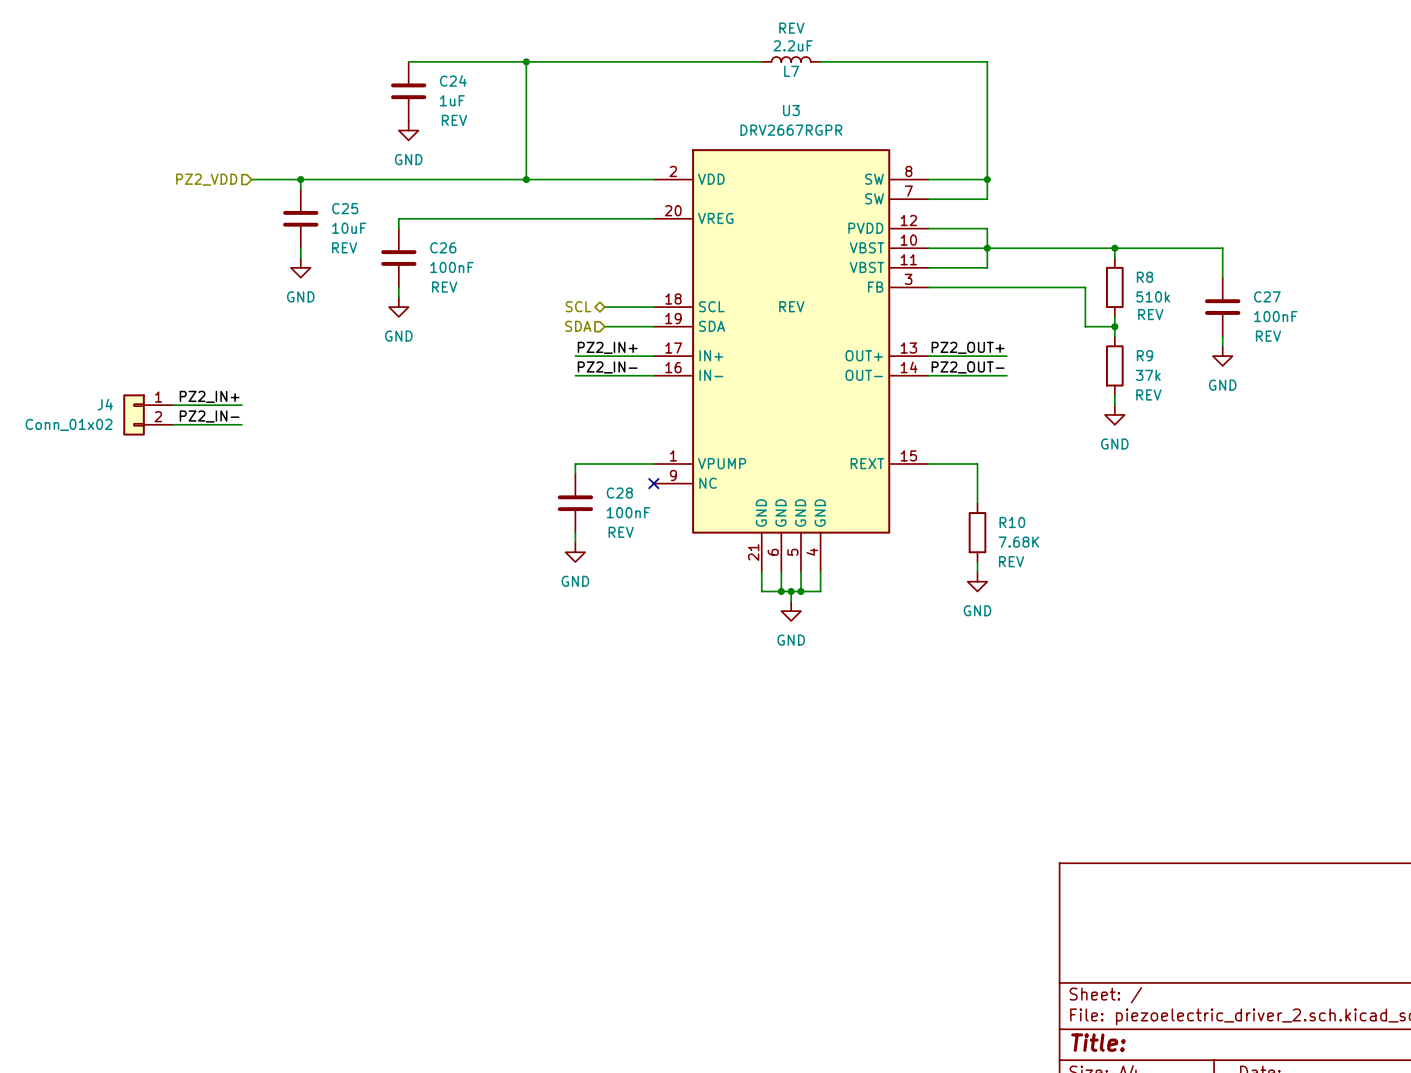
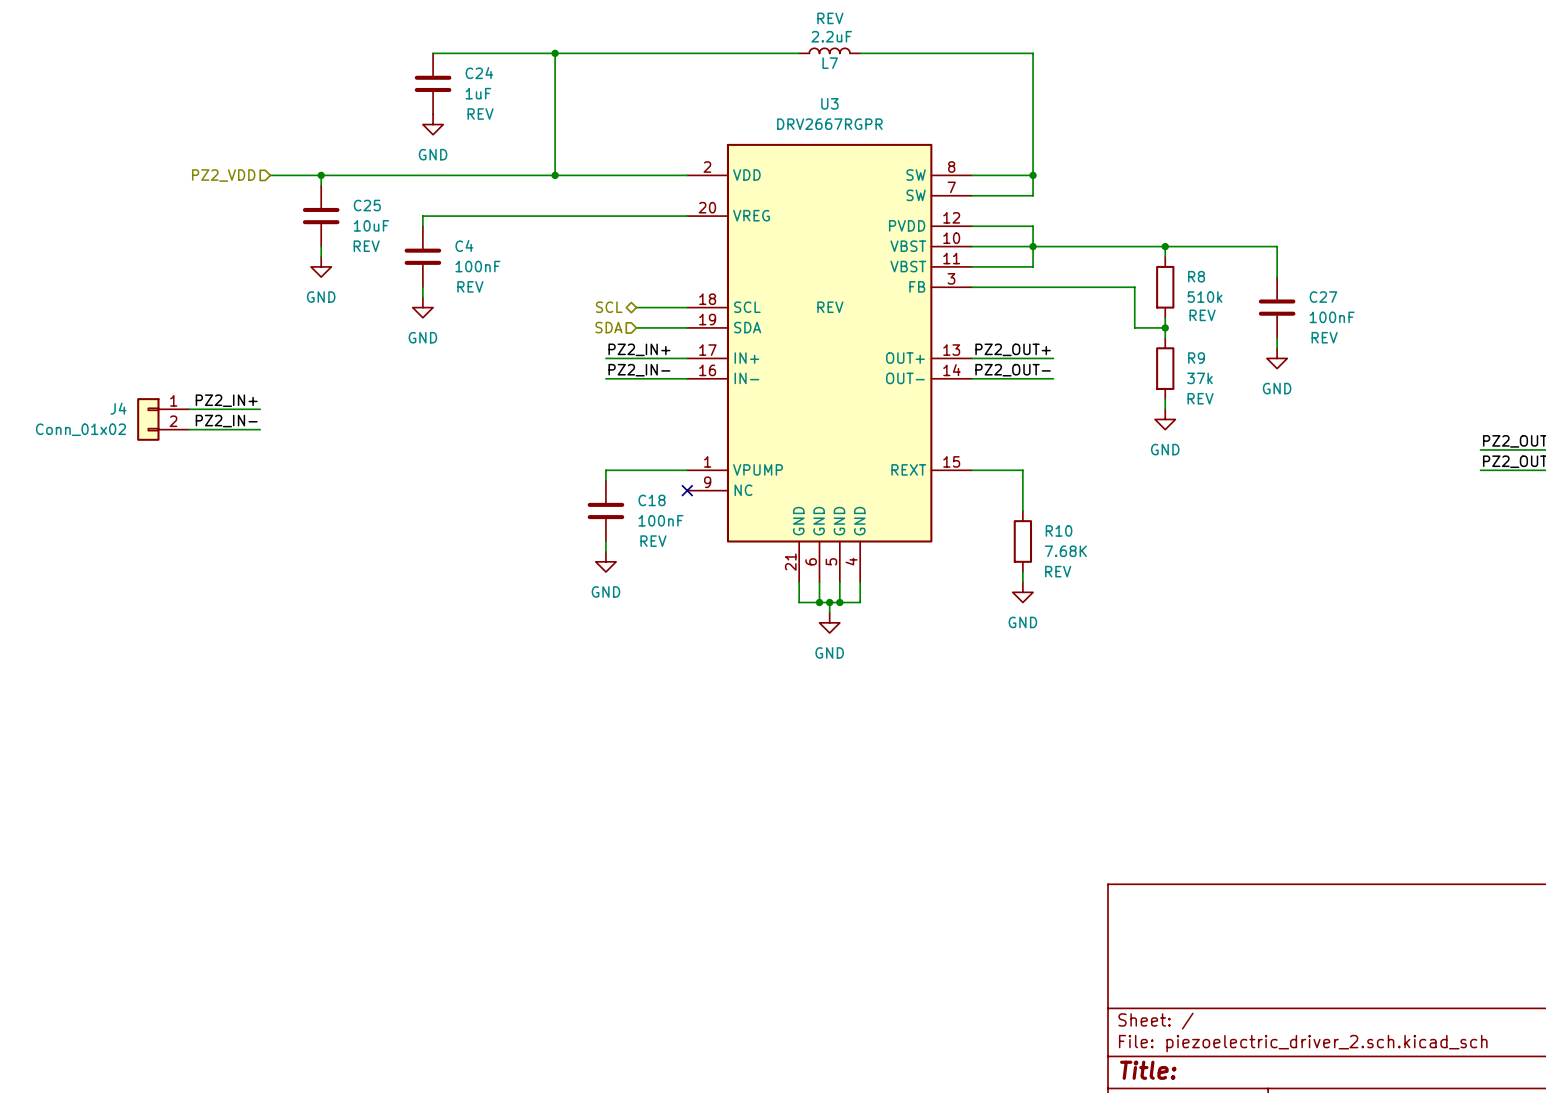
C26 name: C26 (443, 247) -> C4 (464, 245)
C28 name: C28 (619, 493) -> C18 (652, 500)

